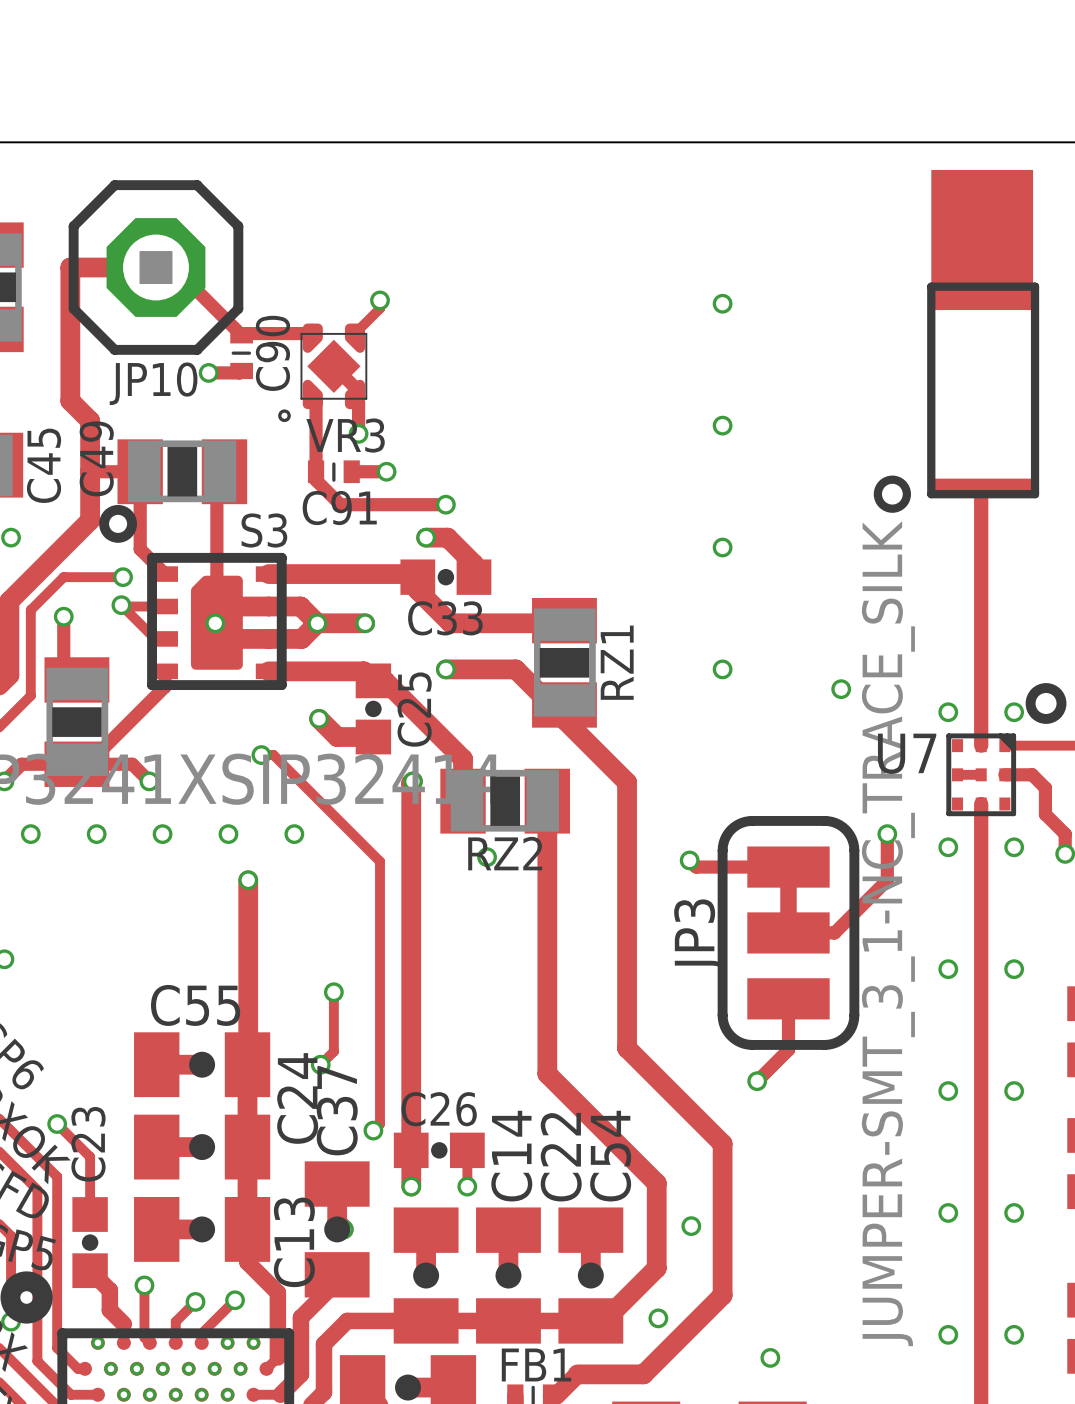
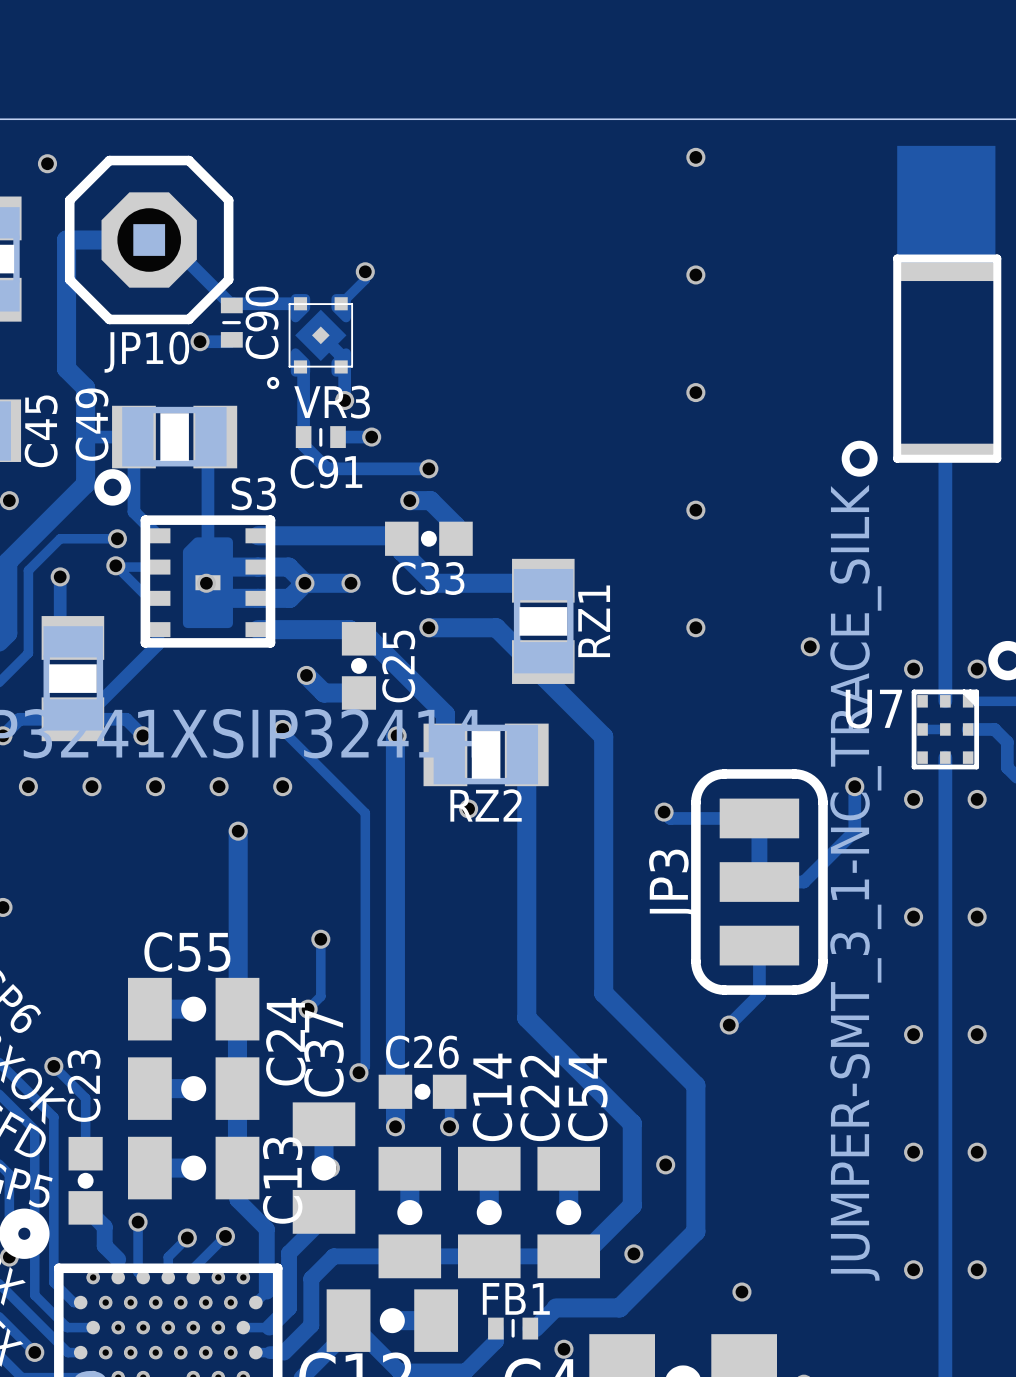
via: none -> (695, 157)
via: none -> (47, 163)
track: (261, 755) (273, 755) (294, 775) -> none
via position: (261, 755) -> (282, 729)

